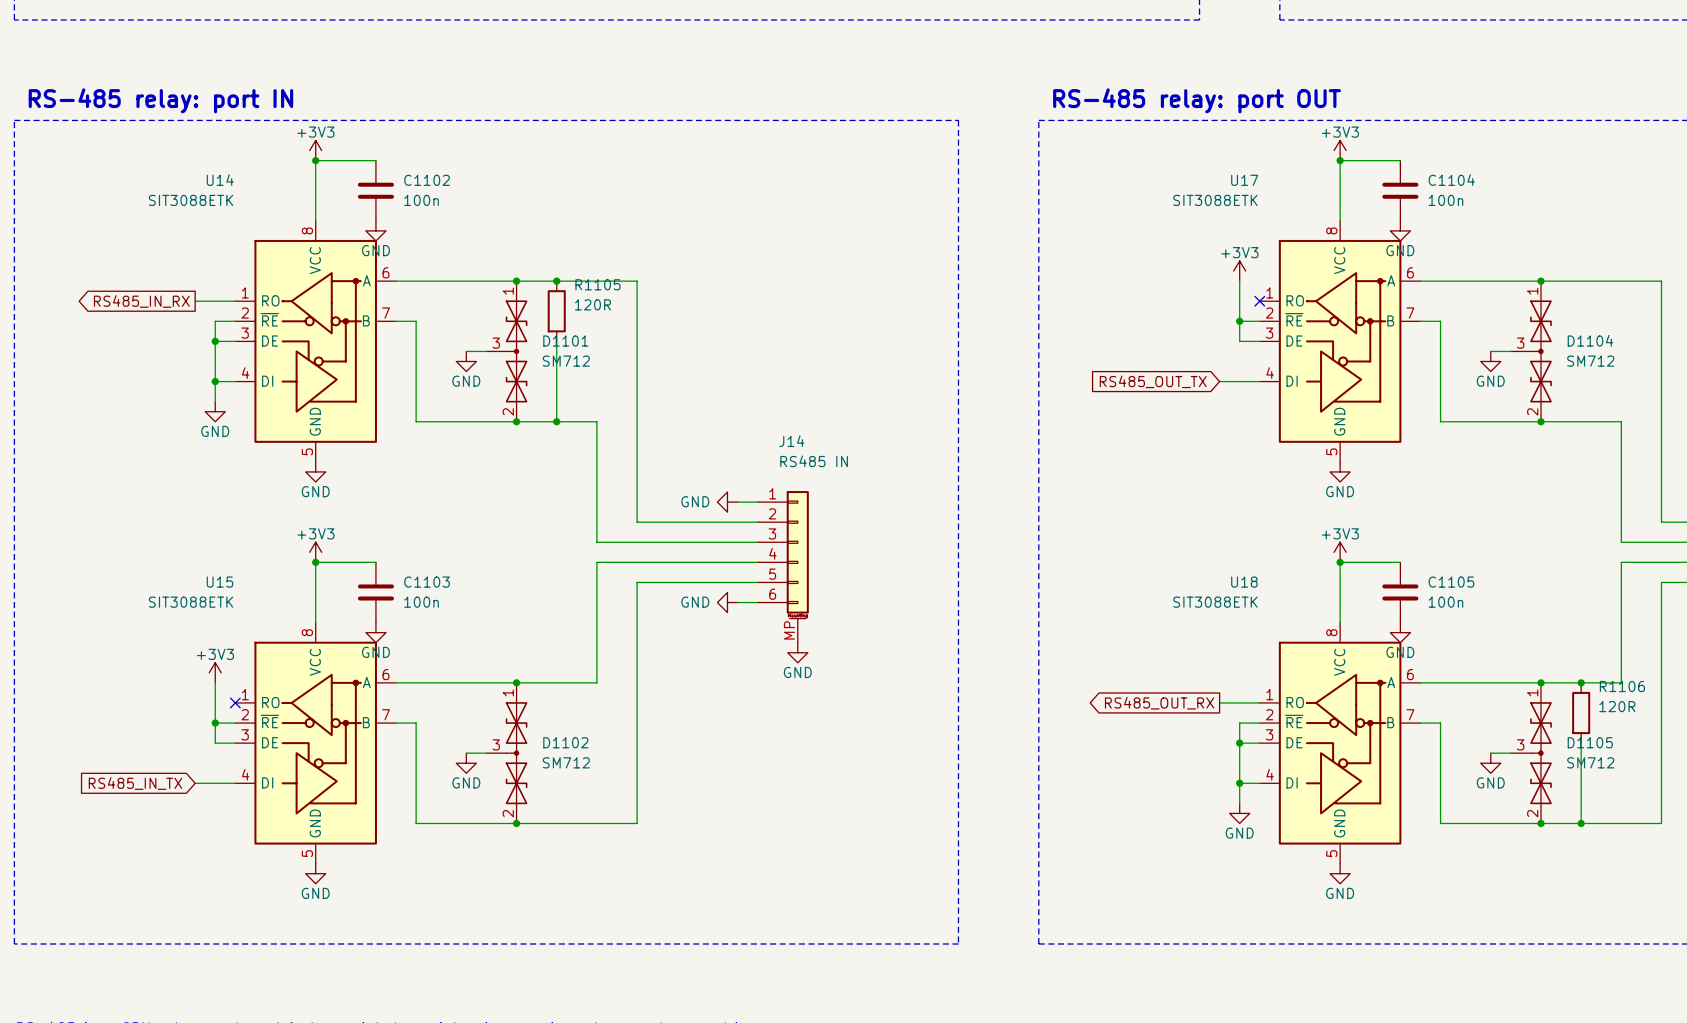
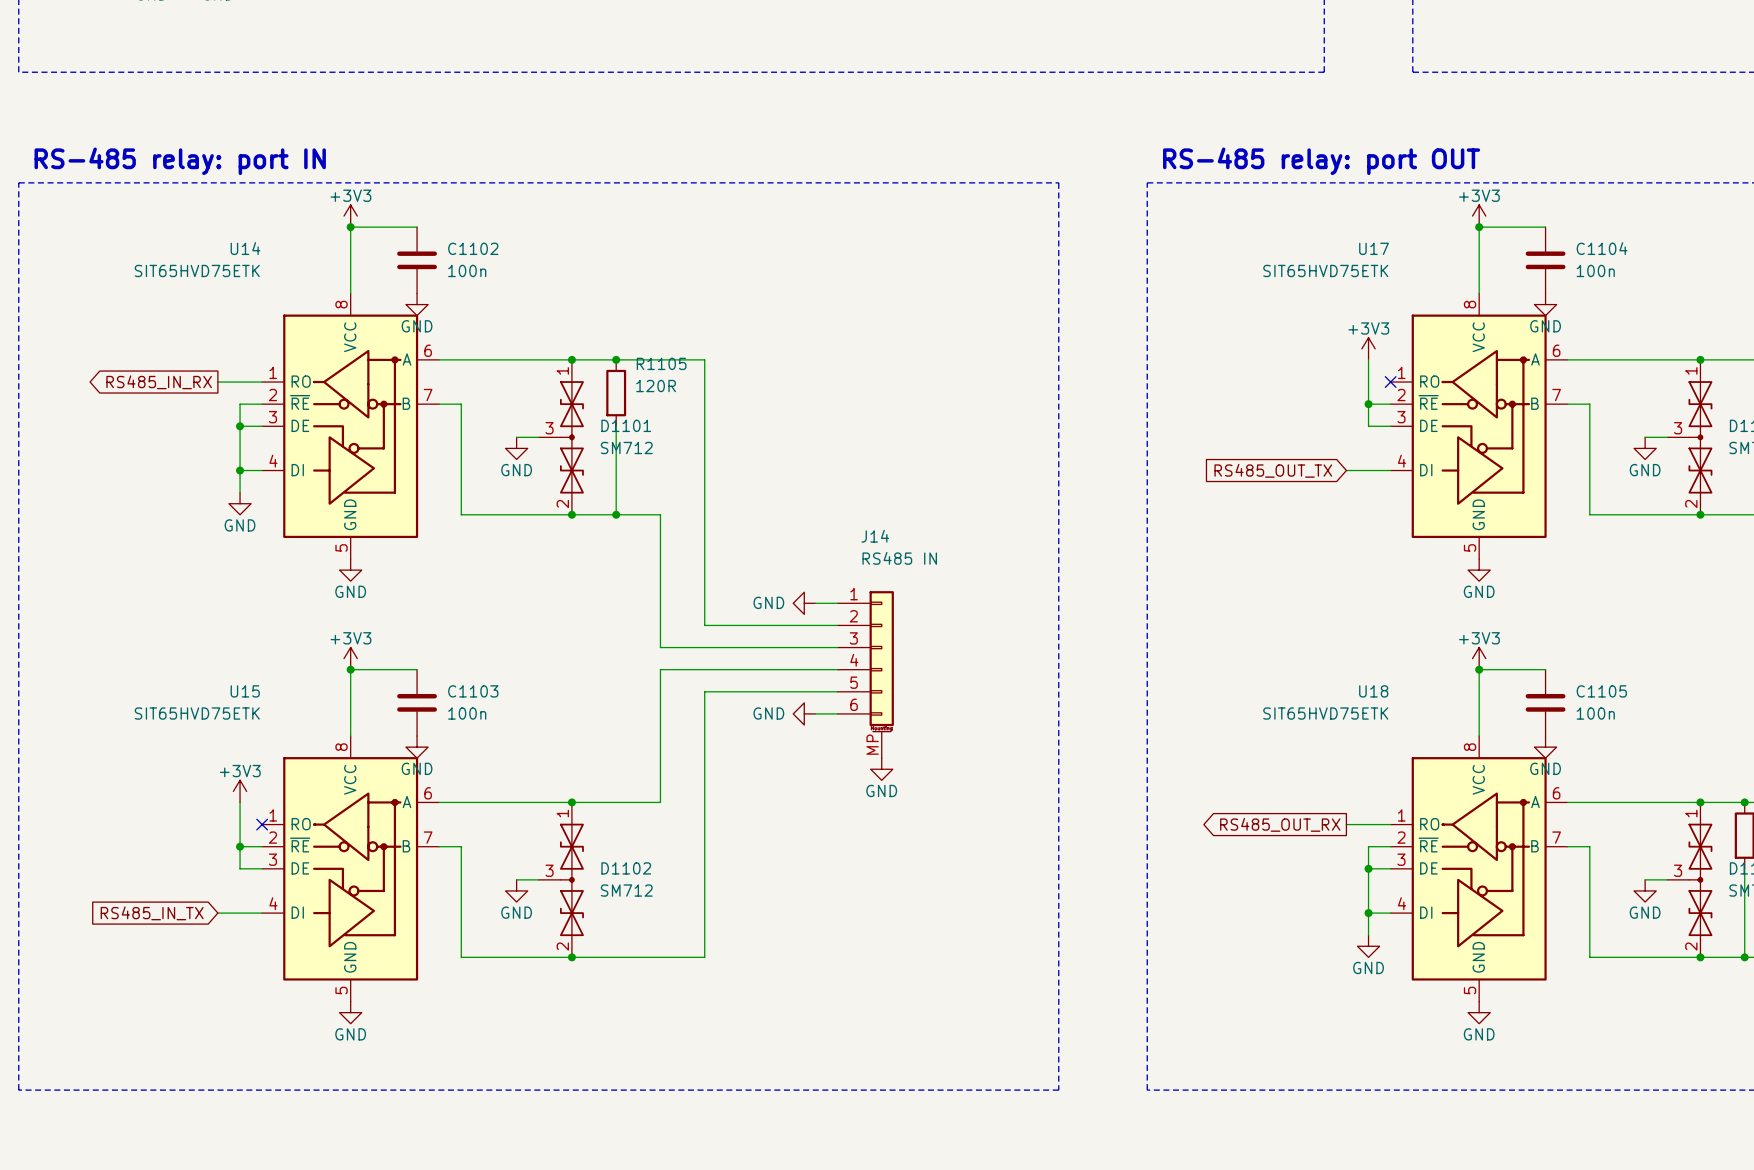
U14 value: SIT3088ETK (191, 200) -> SIT65HVD75ETK (197, 270)
U17 value: SIT3088ETK (1215, 200) -> SIT65HVD75ETK (1325, 270)
U15 value: SIT3088ETK (191, 602) -> SIT65HVD75ETK (197, 713)
U18 value: SIT3088ETK (1215, 602) -> SIT65HVD75ETK (1325, 713)

